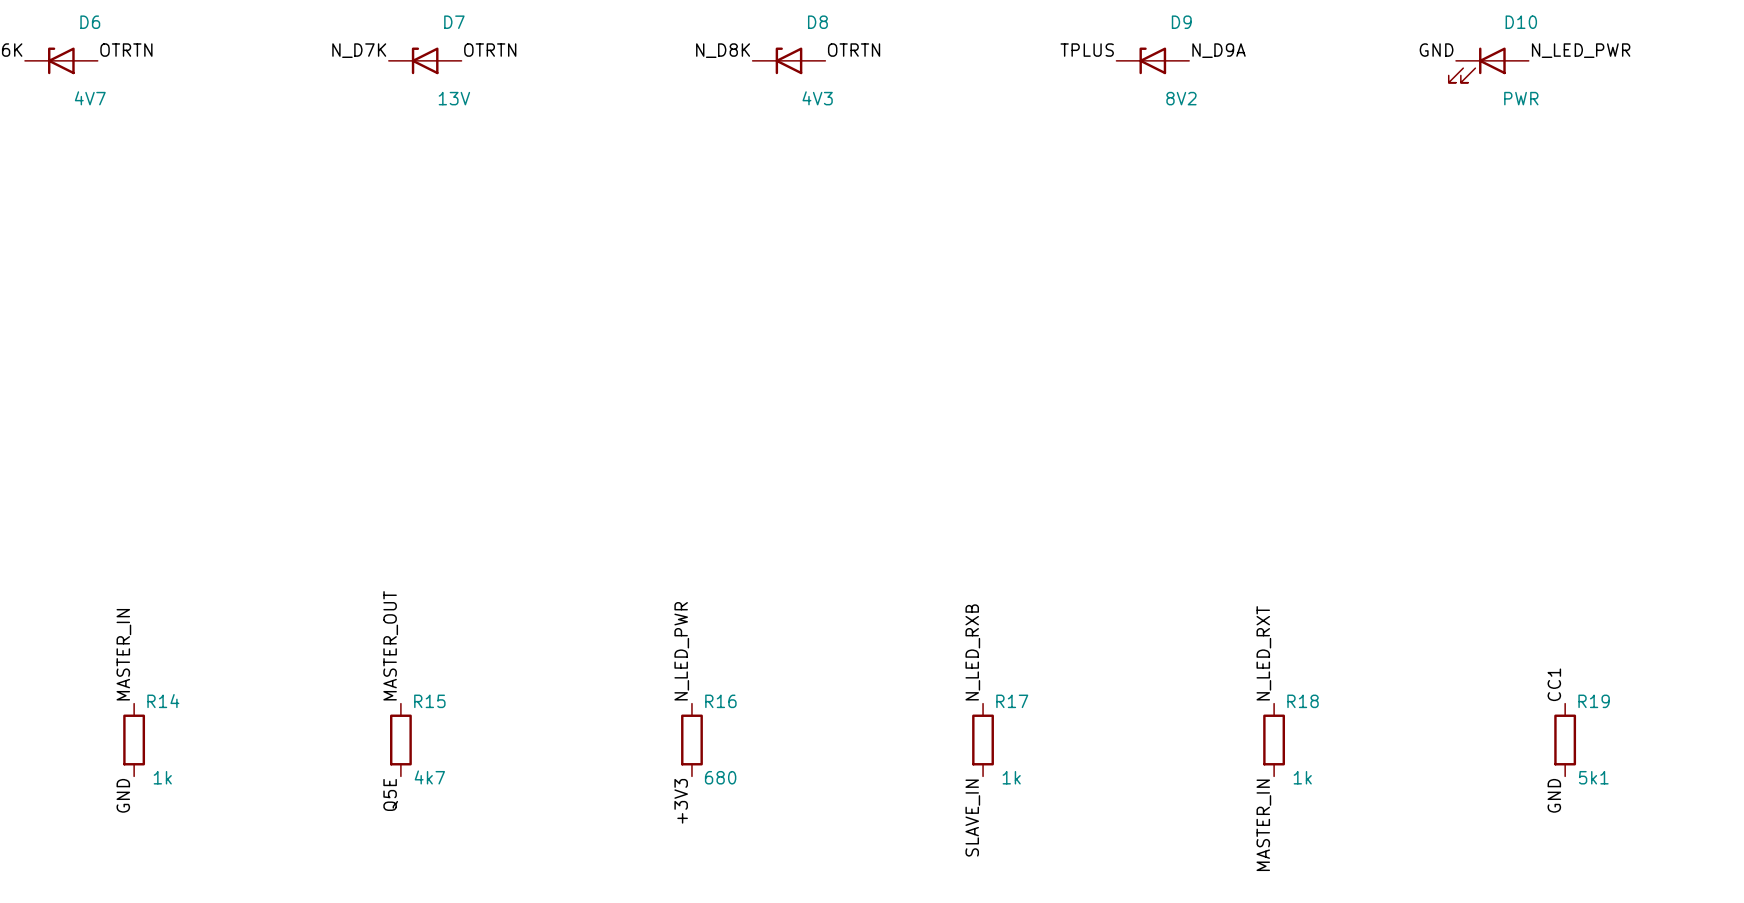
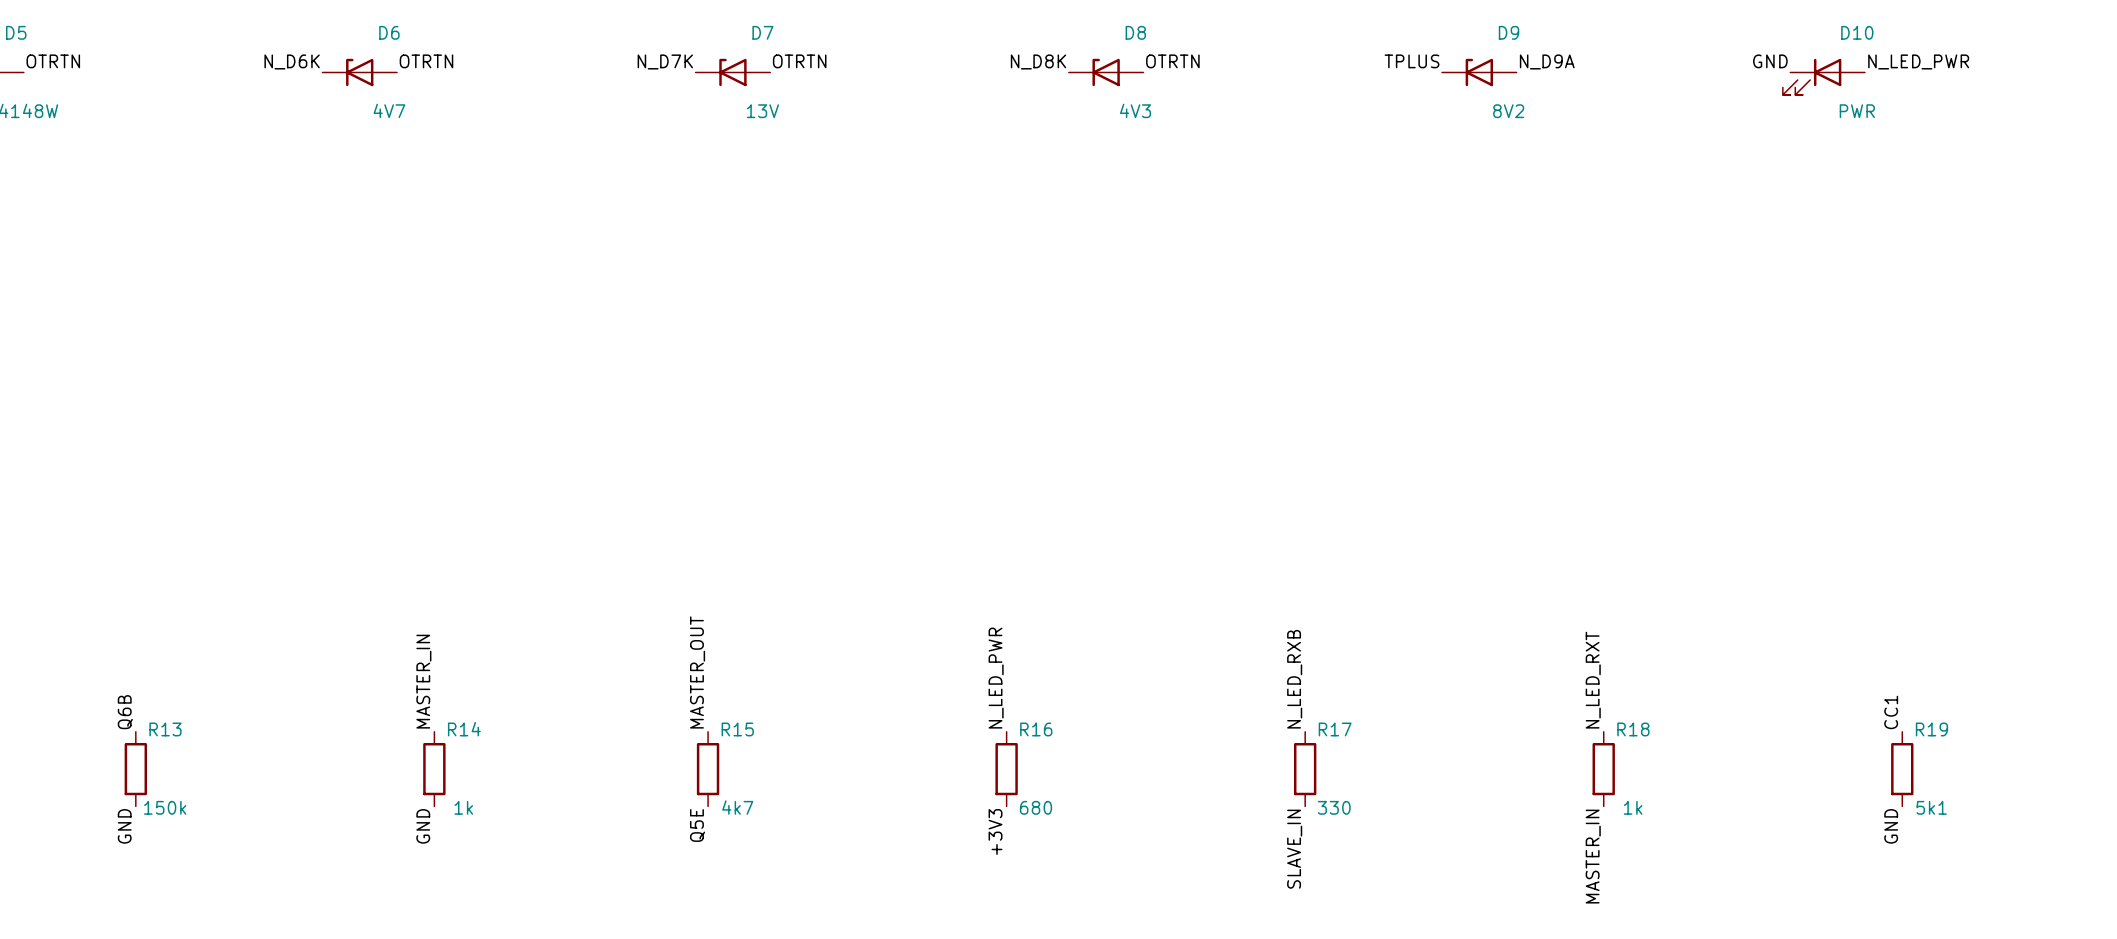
R17 value: 1k (1011, 777) -> 330 (1334, 807)

